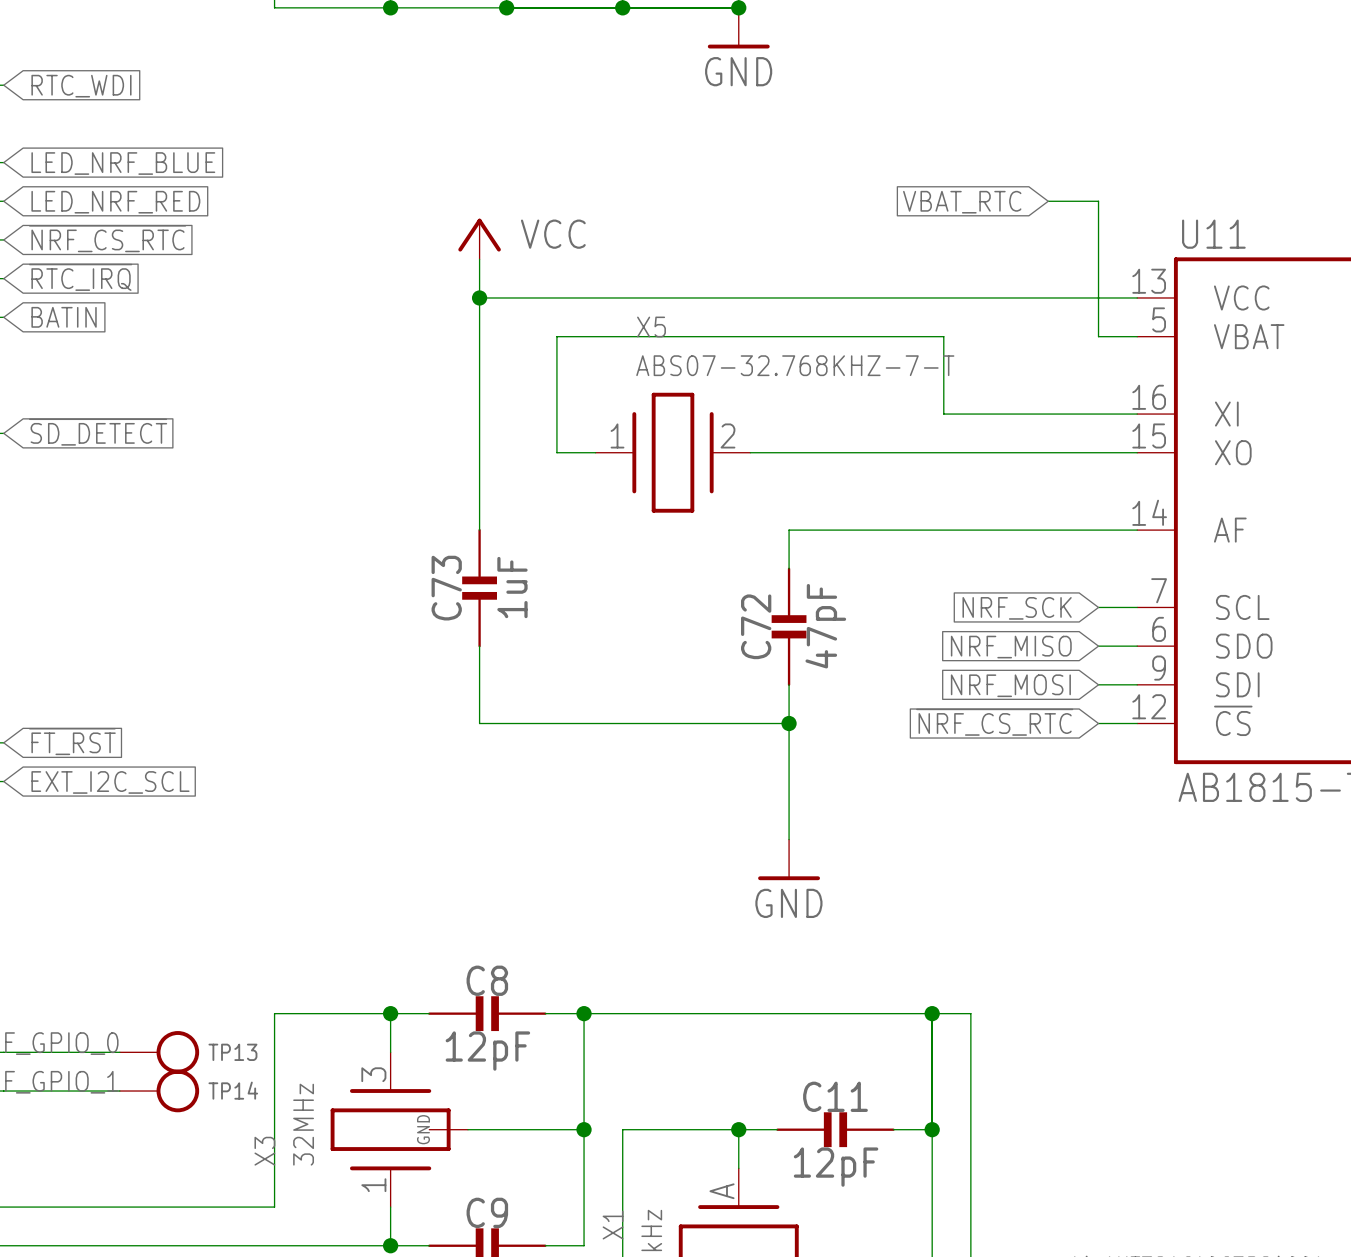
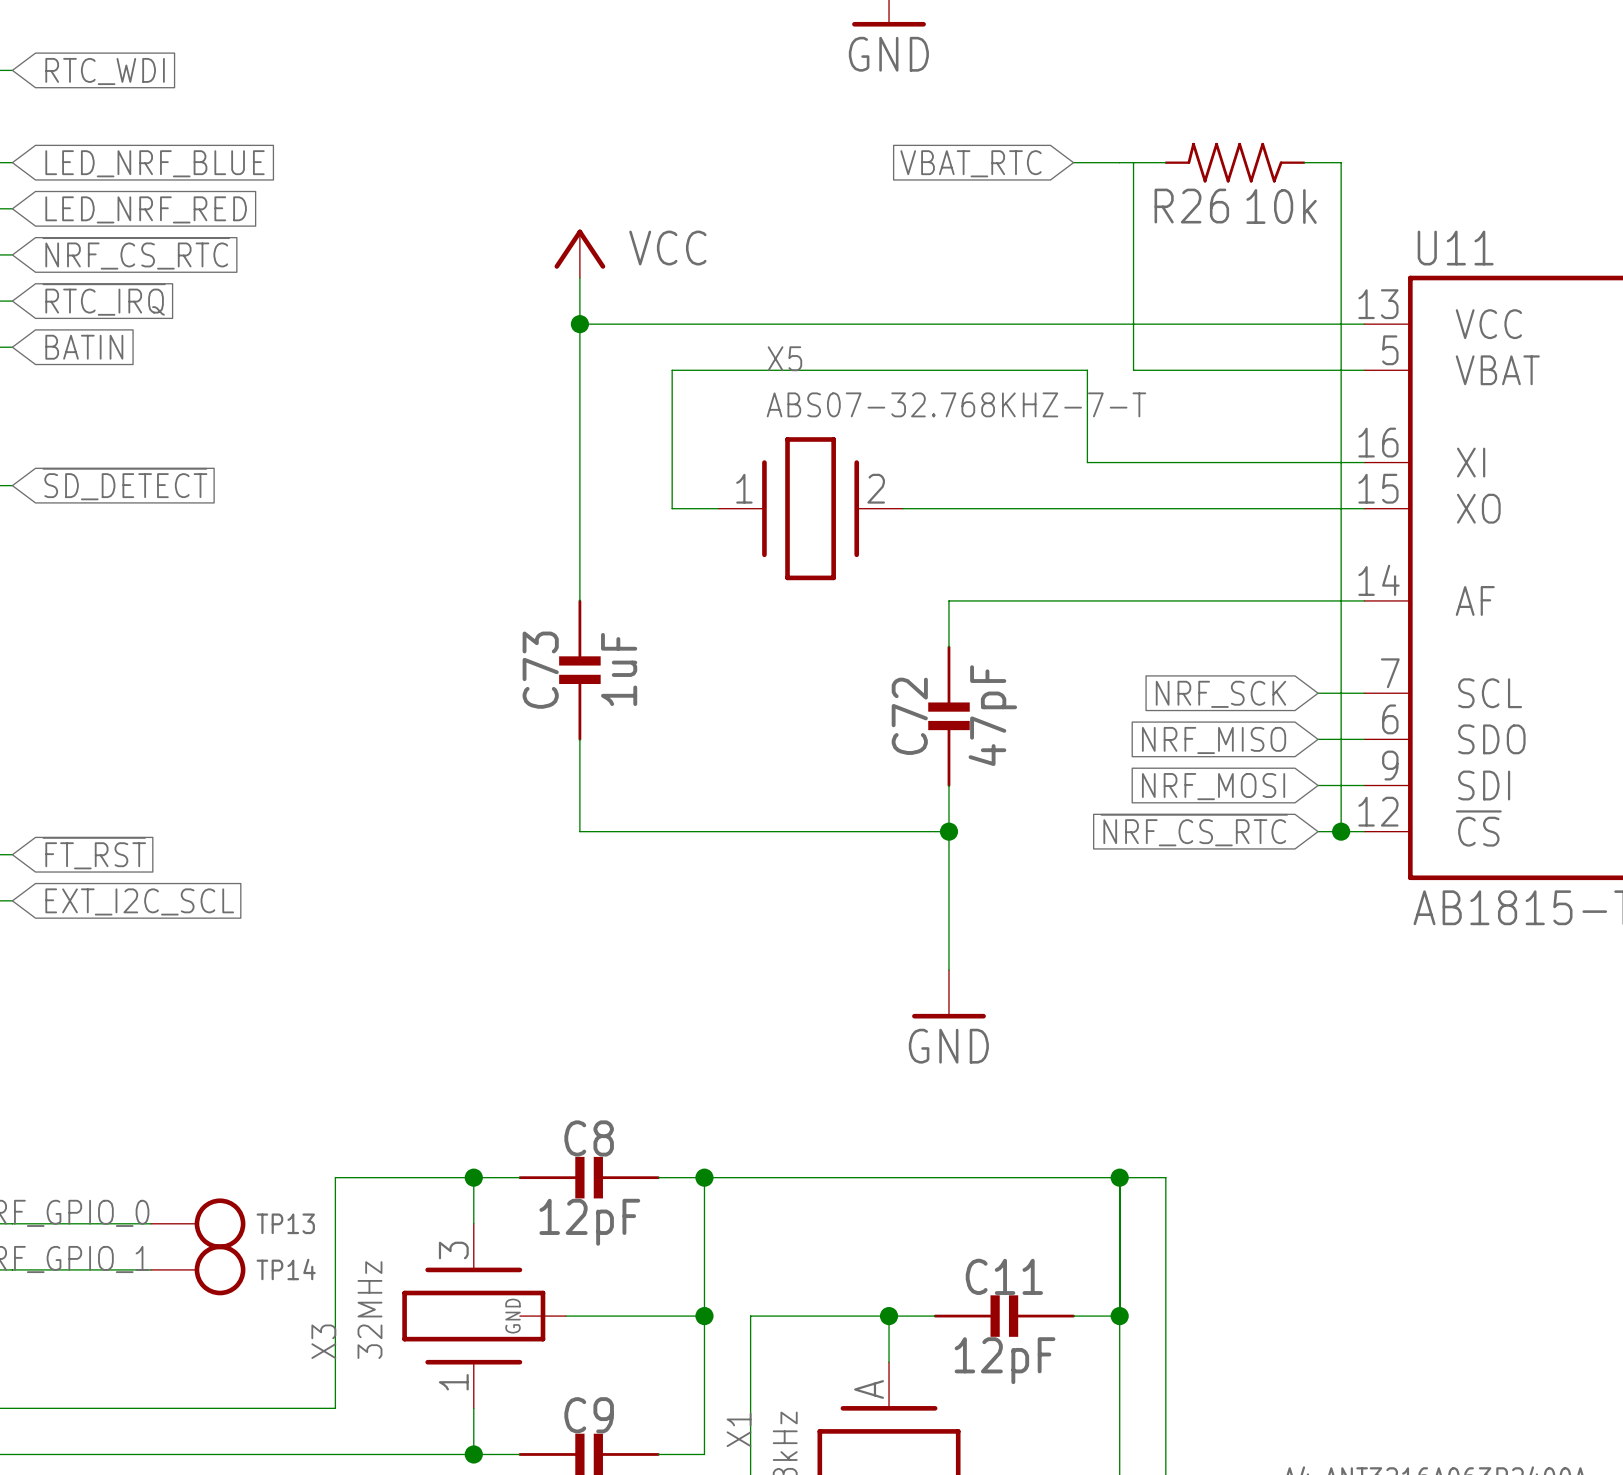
wire: none -> (1073, 162) (1165, 162)
R26: none -> 10k (1235, 162)
wire: none -> (1304, 162) (1341, 162) (1341, 831)
wire: (1048, 201) (1098, 201) (1098, 336) -> (1133, 162) (1133, 370) (1318, 370)
global label position: VBAT_RTC (962, 202) -> VBAT_RTC (971, 163)
wire: (905, 336) (943, 336) (943, 414) -> (1087, 370) (1087, 462) (1133, 462)
junction: none -> (1341, 831)

